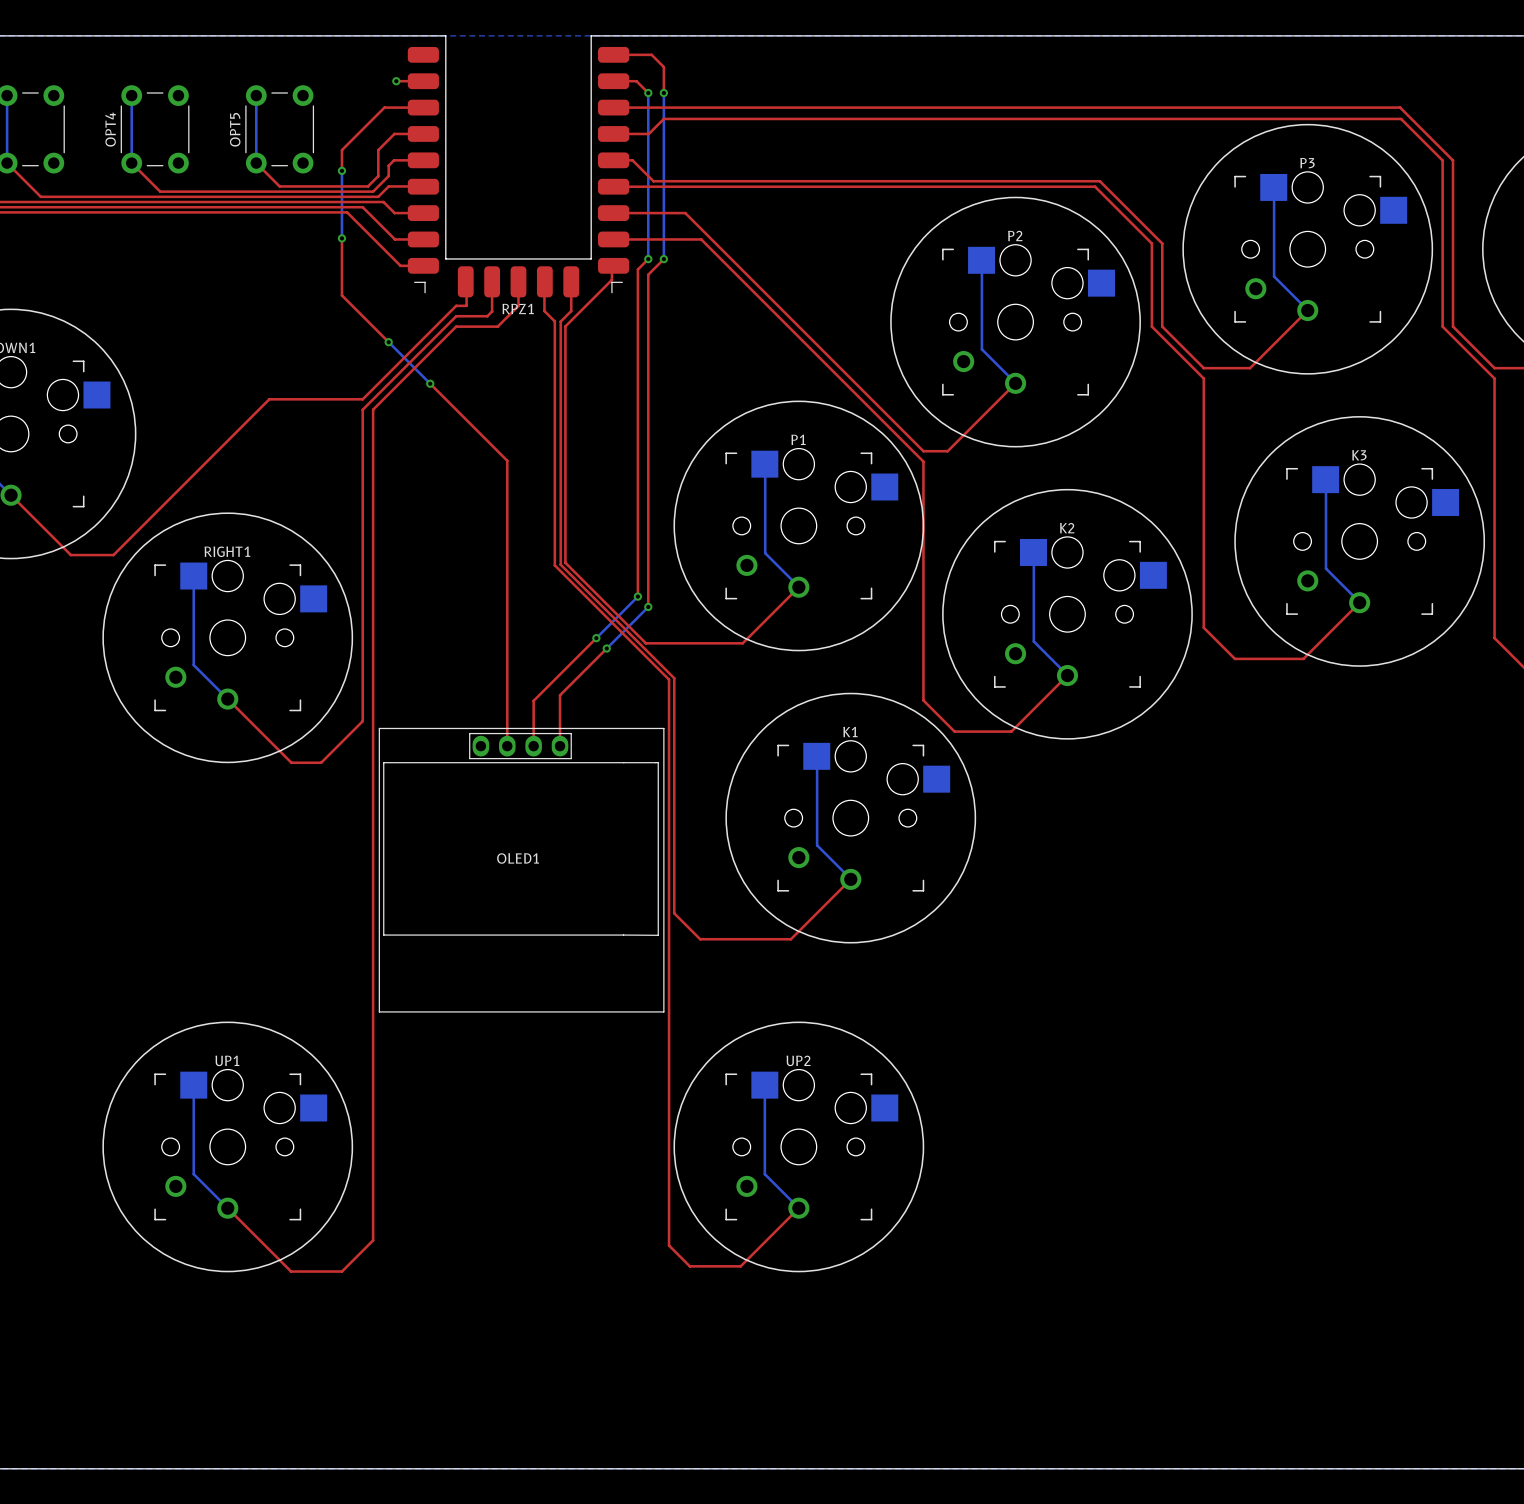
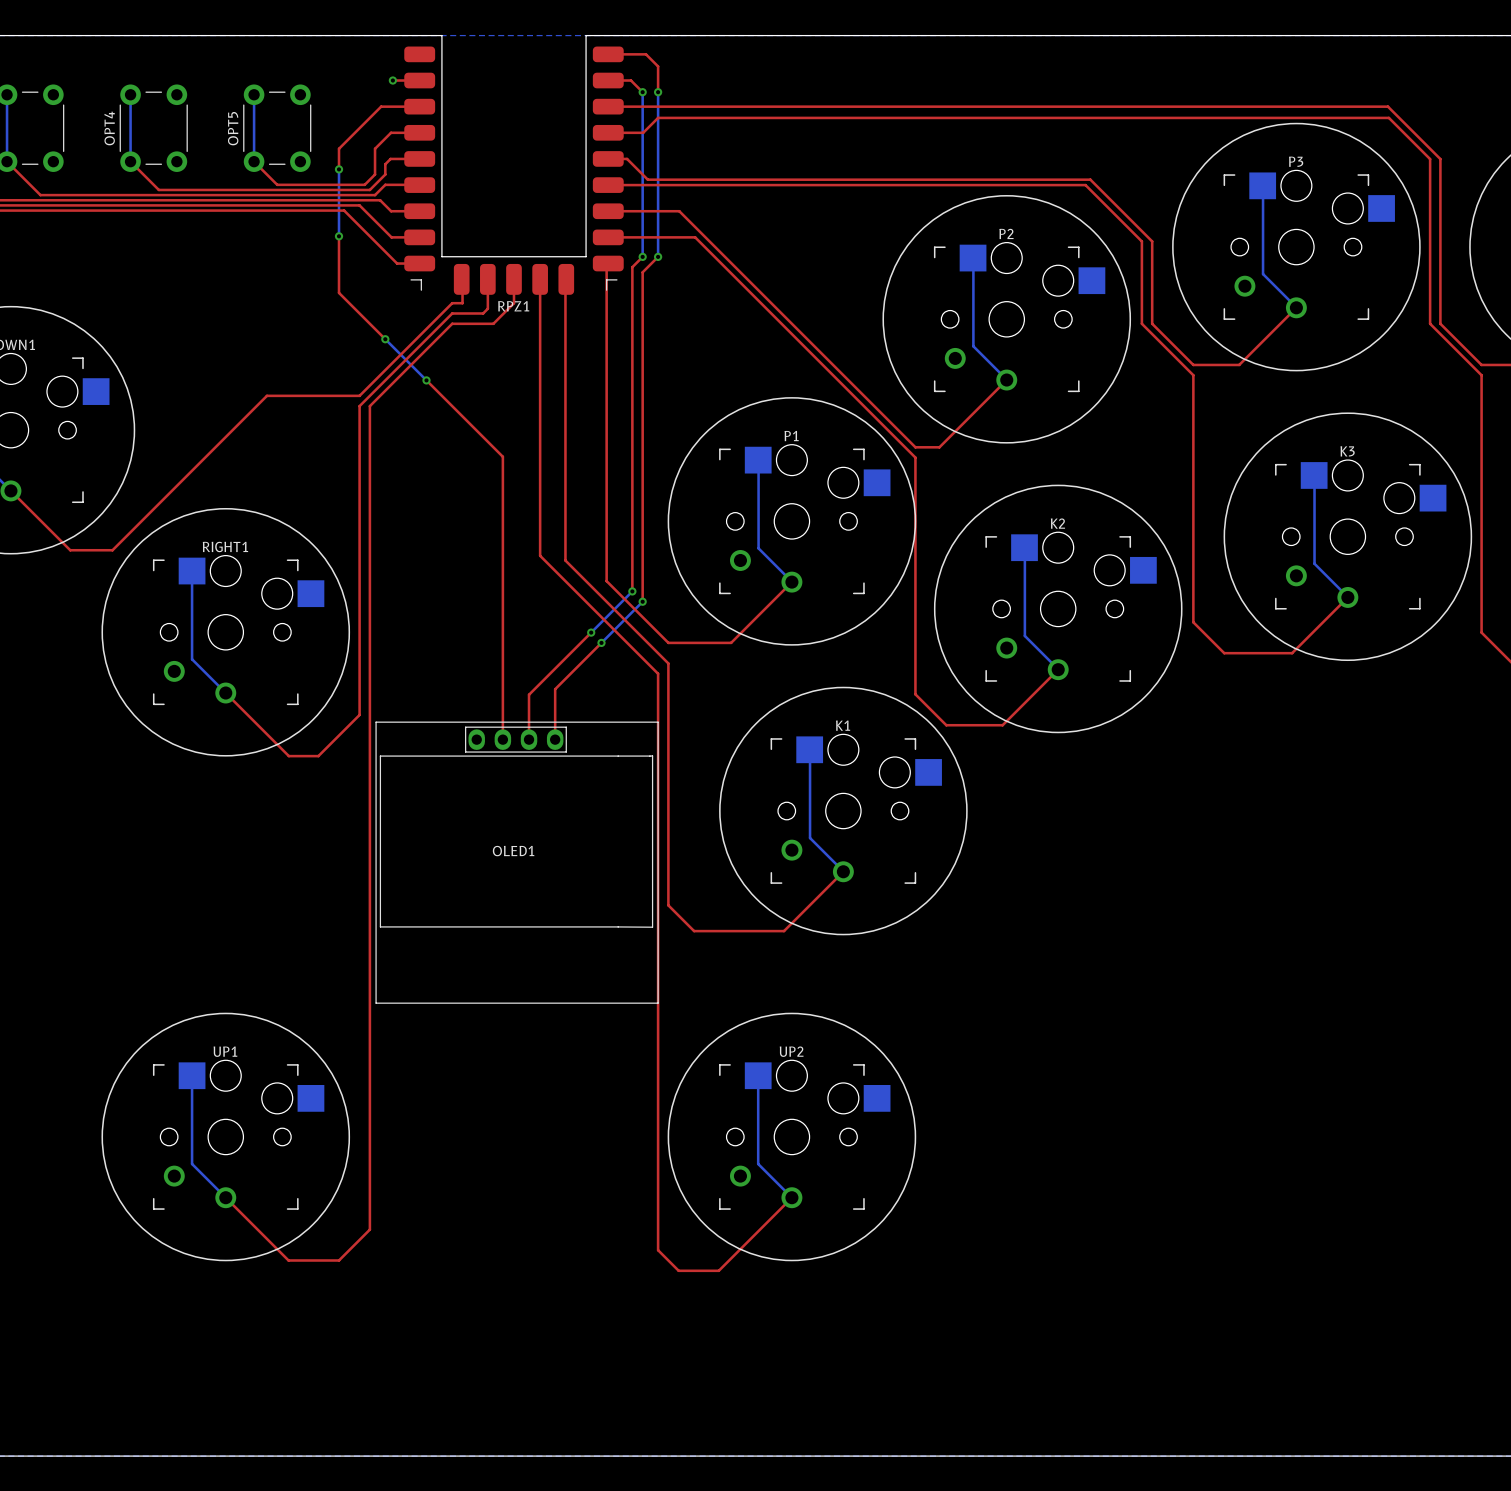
top track: (611, 279) (565, 326) (565, 562) (645, 643) (742, 643) -> (606, 277) (606, 581) (668, 642) (731, 642) (736, 637)
top track: (544, 281) (544, 311) (554, 321) (554, 565) (669, 679) (669, 1245) (689, 1266) (740, 1266) -> (540, 279) (540, 555) (658, 673) (658, 1250) (678, 1270) (718, 1270) (734, 1255)
top track: (571, 281) (571, 311) (560, 321) -> none
top track: (560, 321) (560, 564) (674, 678) -> (566, 279) (565, 560) (668, 663) (668, 672)

